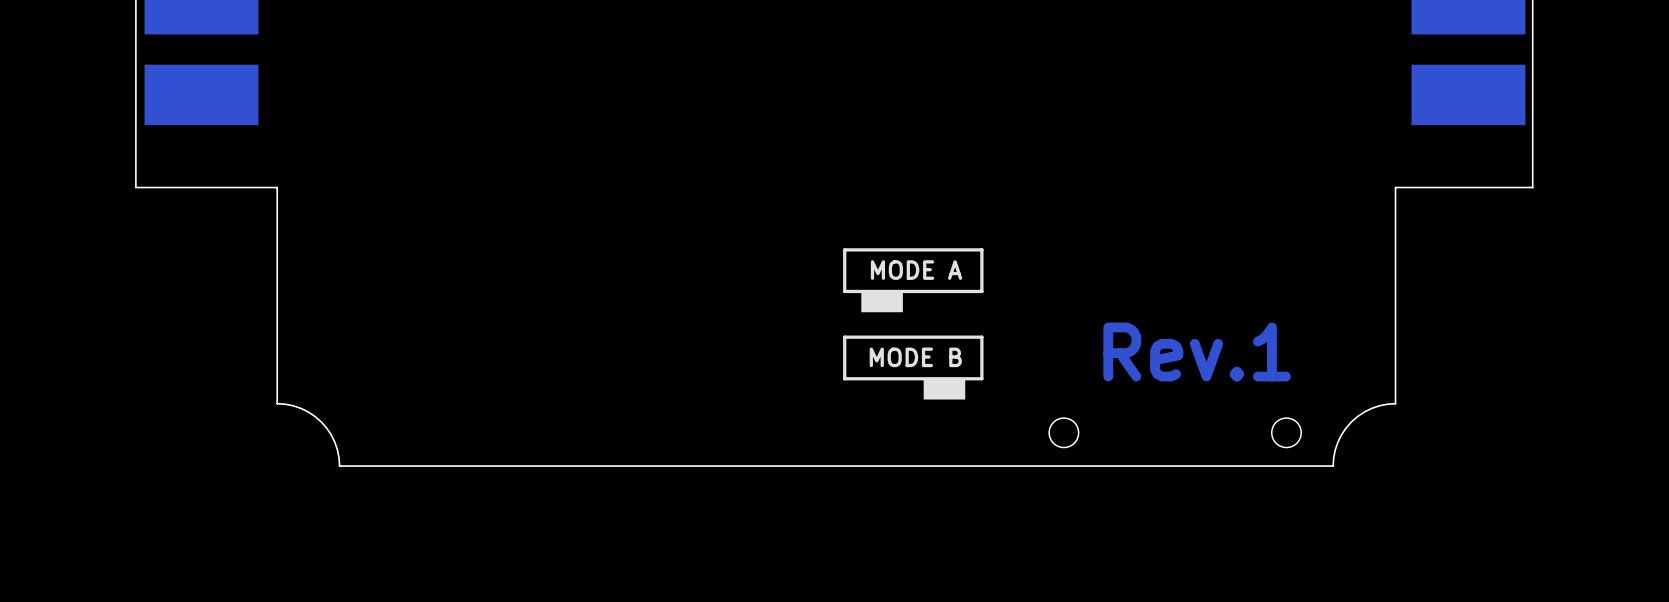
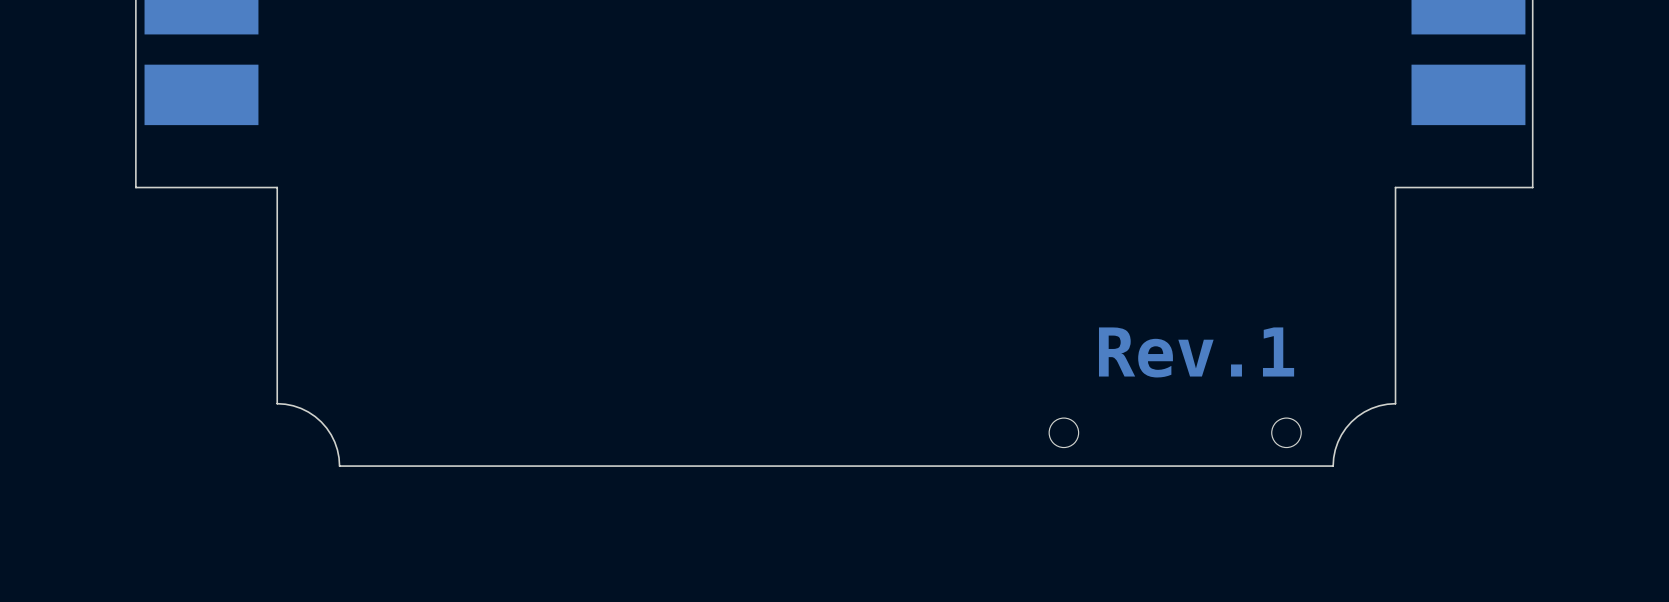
line: (981, 249) (844, 249) (844, 291) (981, 291) (981, 249) -> none
text: MODE A (916, 270) -> none
drawing: [861, 291, 903, 313] -> none
line: (981, 337) (981, 378) (844, 378) (844, 337) (981, 337) -> none
text: MODE B (915, 357) -> none
drawing: [923, 378, 966, 400] -> none

